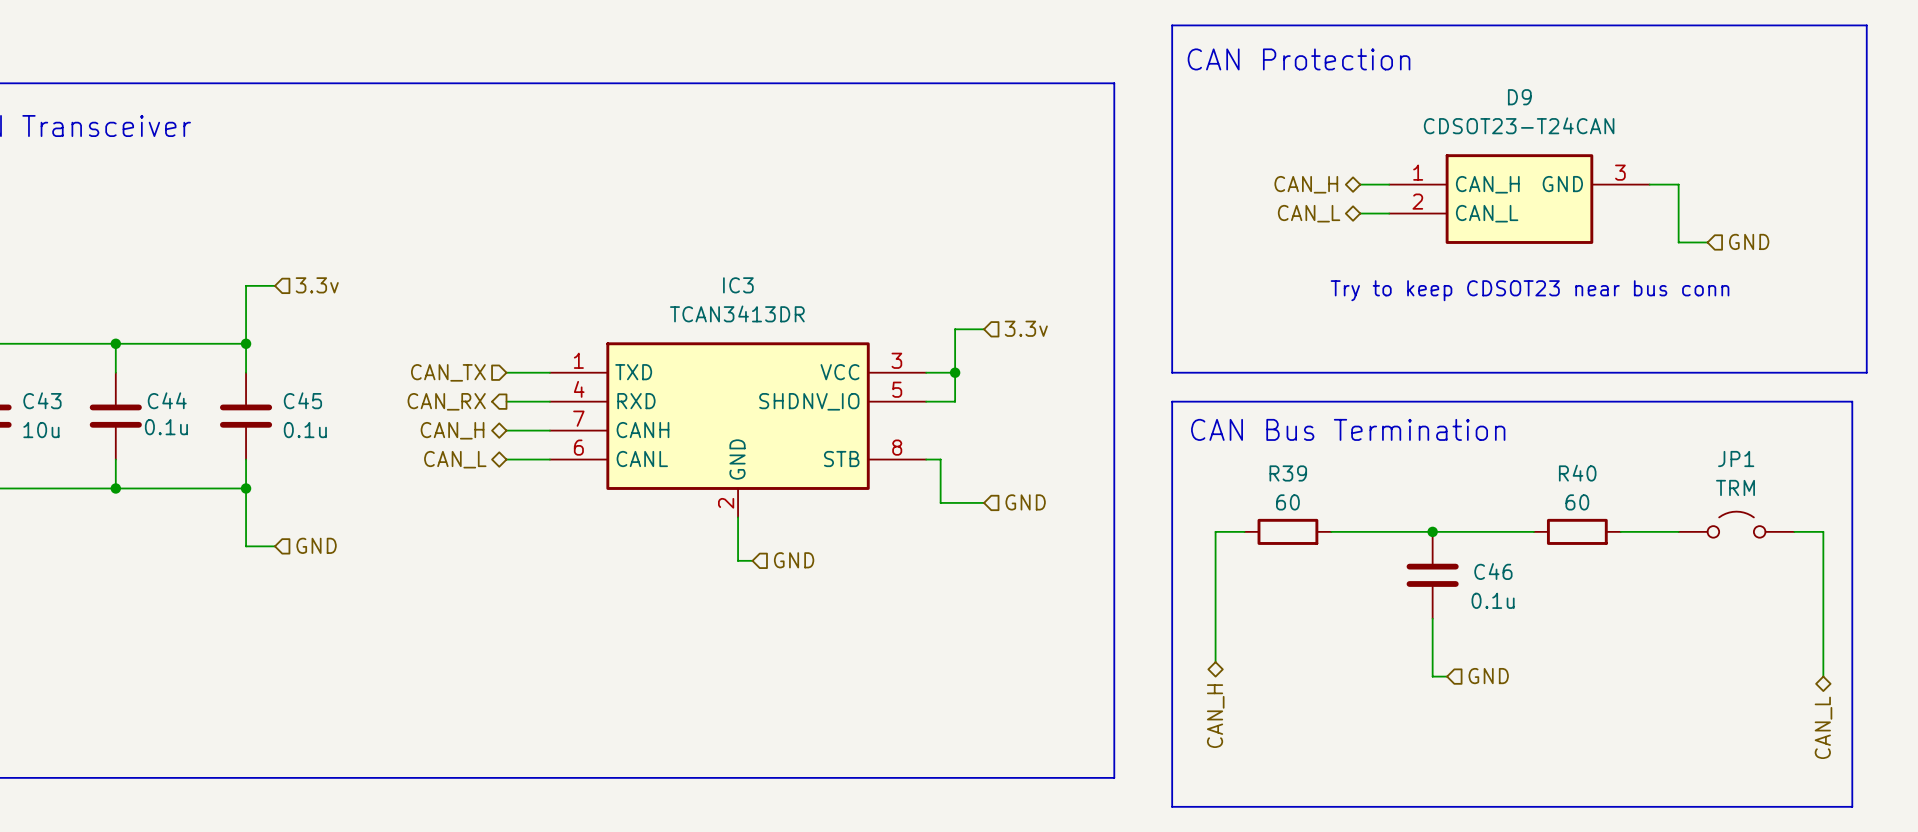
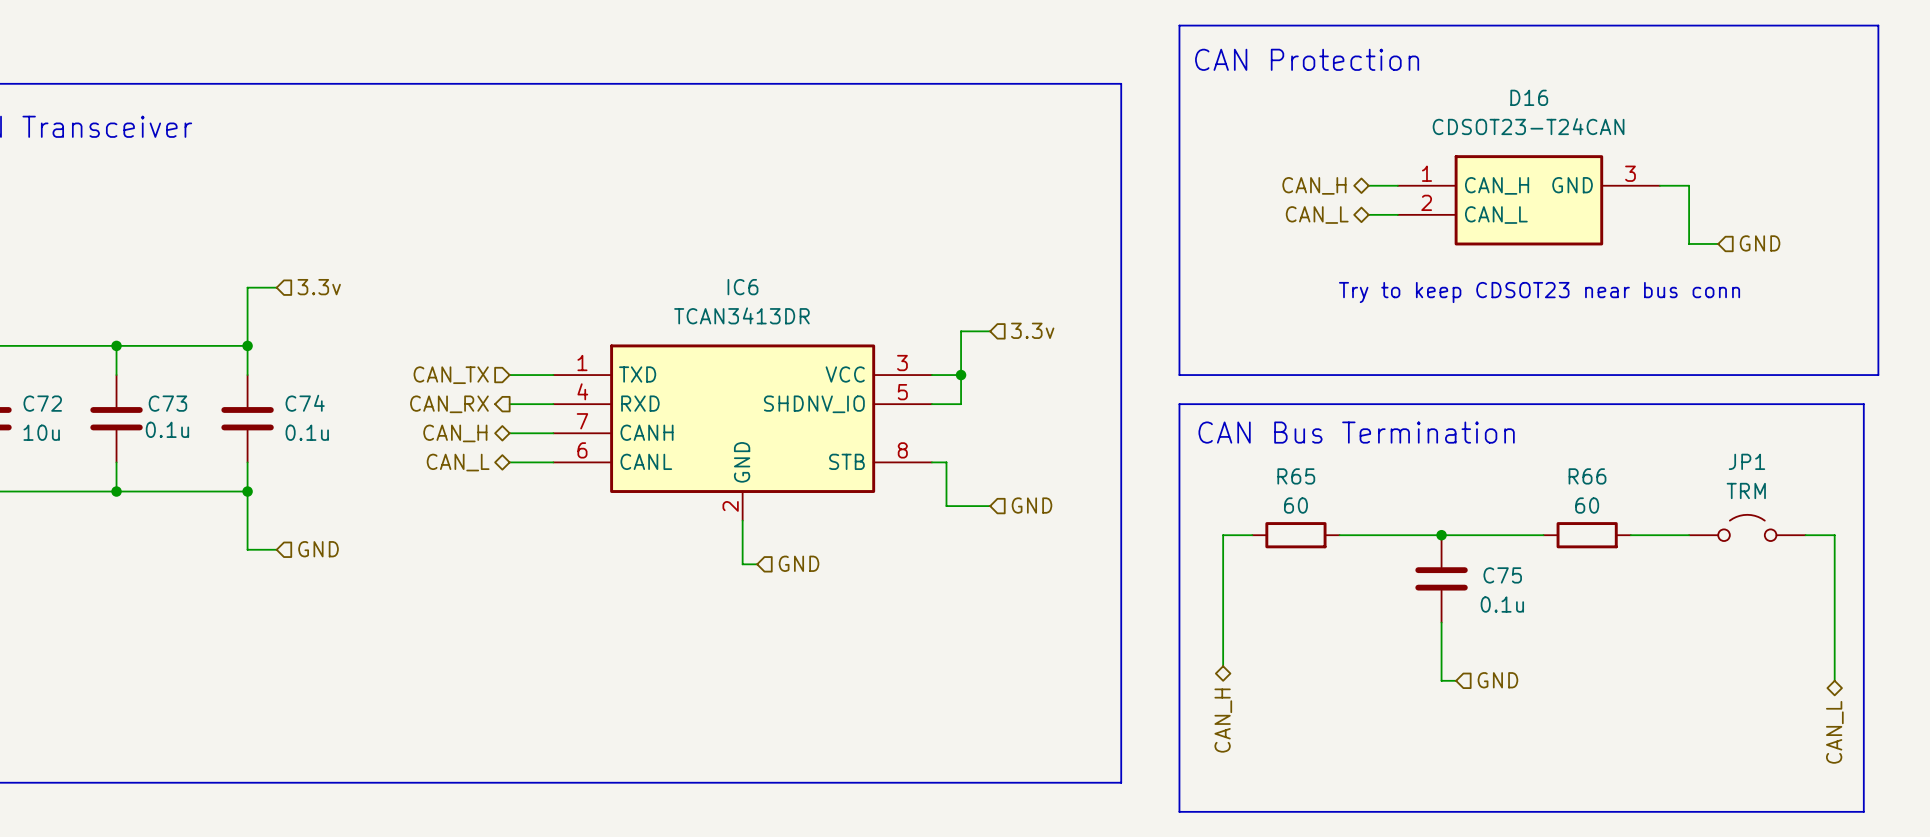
D9 name: D9 (1519, 97) -> D16 (1529, 97)
IC3 name: IC3 (738, 285) -> IC6 (742, 287)
C43 name: C43 (42, 400) -> C72 (42, 403)
C44 name: C44 (167, 400) -> C73 (167, 403)
C45 name: C45 (302, 400) -> C74 (305, 403)
R39 name: R39 (1288, 473) -> R65 (1296, 476)
R40 name: R40 (1577, 473) -> R66 (1587, 476)
C46 name: C46 (1493, 571) -> C75 (1502, 575)

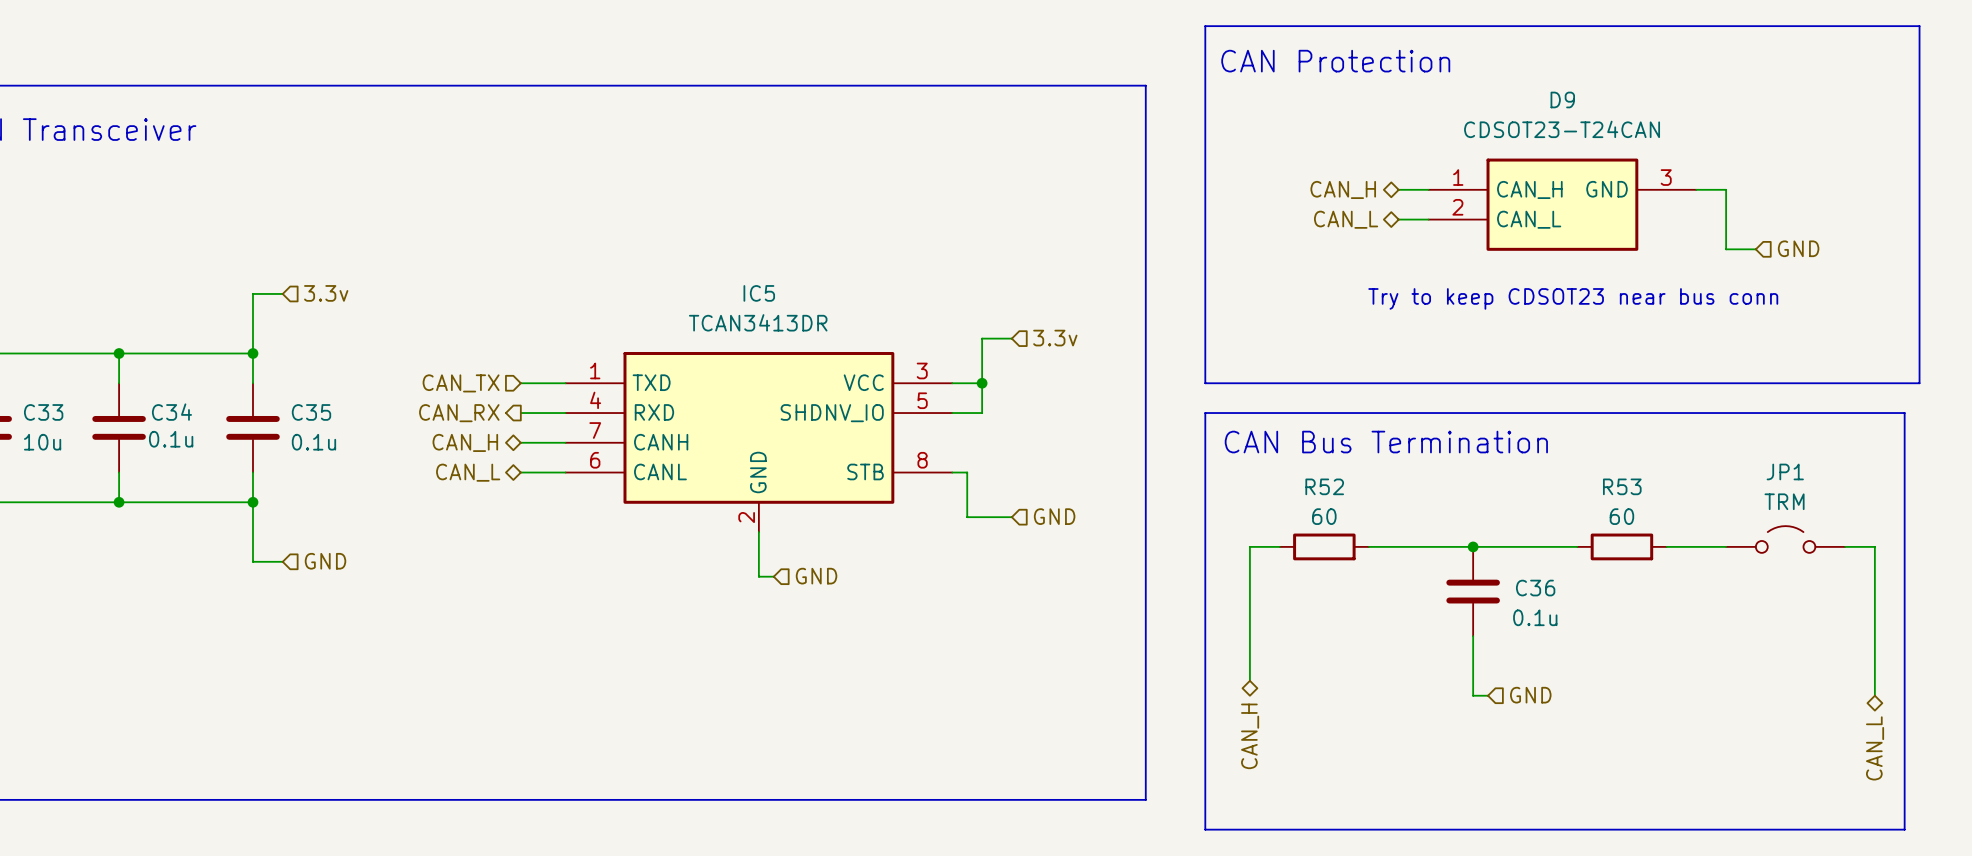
D16 name: D16 (1529, 97) -> D9 (1562, 99)
IC6 name: IC6 (742, 287) -> IC5 (759, 293)
C72 name: C72 (42, 403) -> C33 (43, 412)
C73 name: C73 (167, 403) -> C34 (171, 412)
C74 name: C74 (305, 403) -> C35 (311, 412)
R65 name: R65 (1296, 476) -> R52 (1324, 486)
R66 name: R66 (1587, 476) -> R53 (1622, 486)
C75 name: C75 (1502, 575) -> C36 (1535, 588)

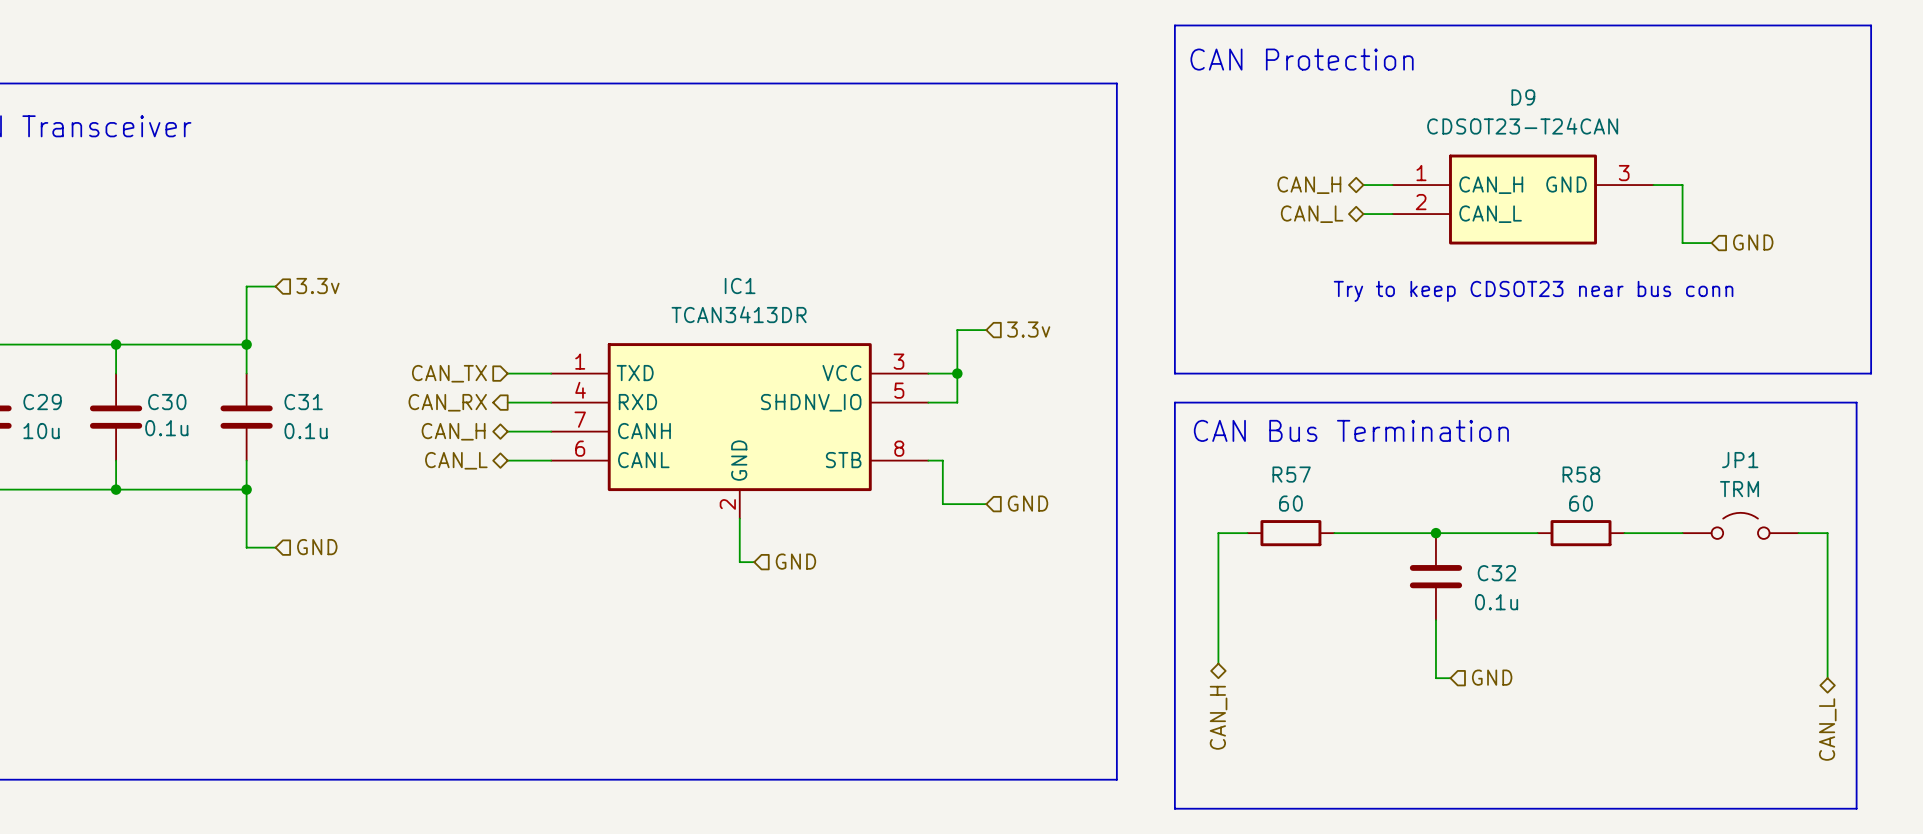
IC5 name: IC5 (759, 293) -> IC1 (740, 286)
C33 name: C33 (43, 412) -> C29 (42, 402)
C34 name: C34 (171, 412) -> C30 (167, 402)
C35 name: C35 (311, 412) -> C31 (303, 402)
R52 name: R52 (1324, 486) -> R57 (1291, 474)
R53 name: R53 (1622, 486) -> R58 (1581, 474)
C36 name: C36 (1535, 588) -> C32 (1496, 573)

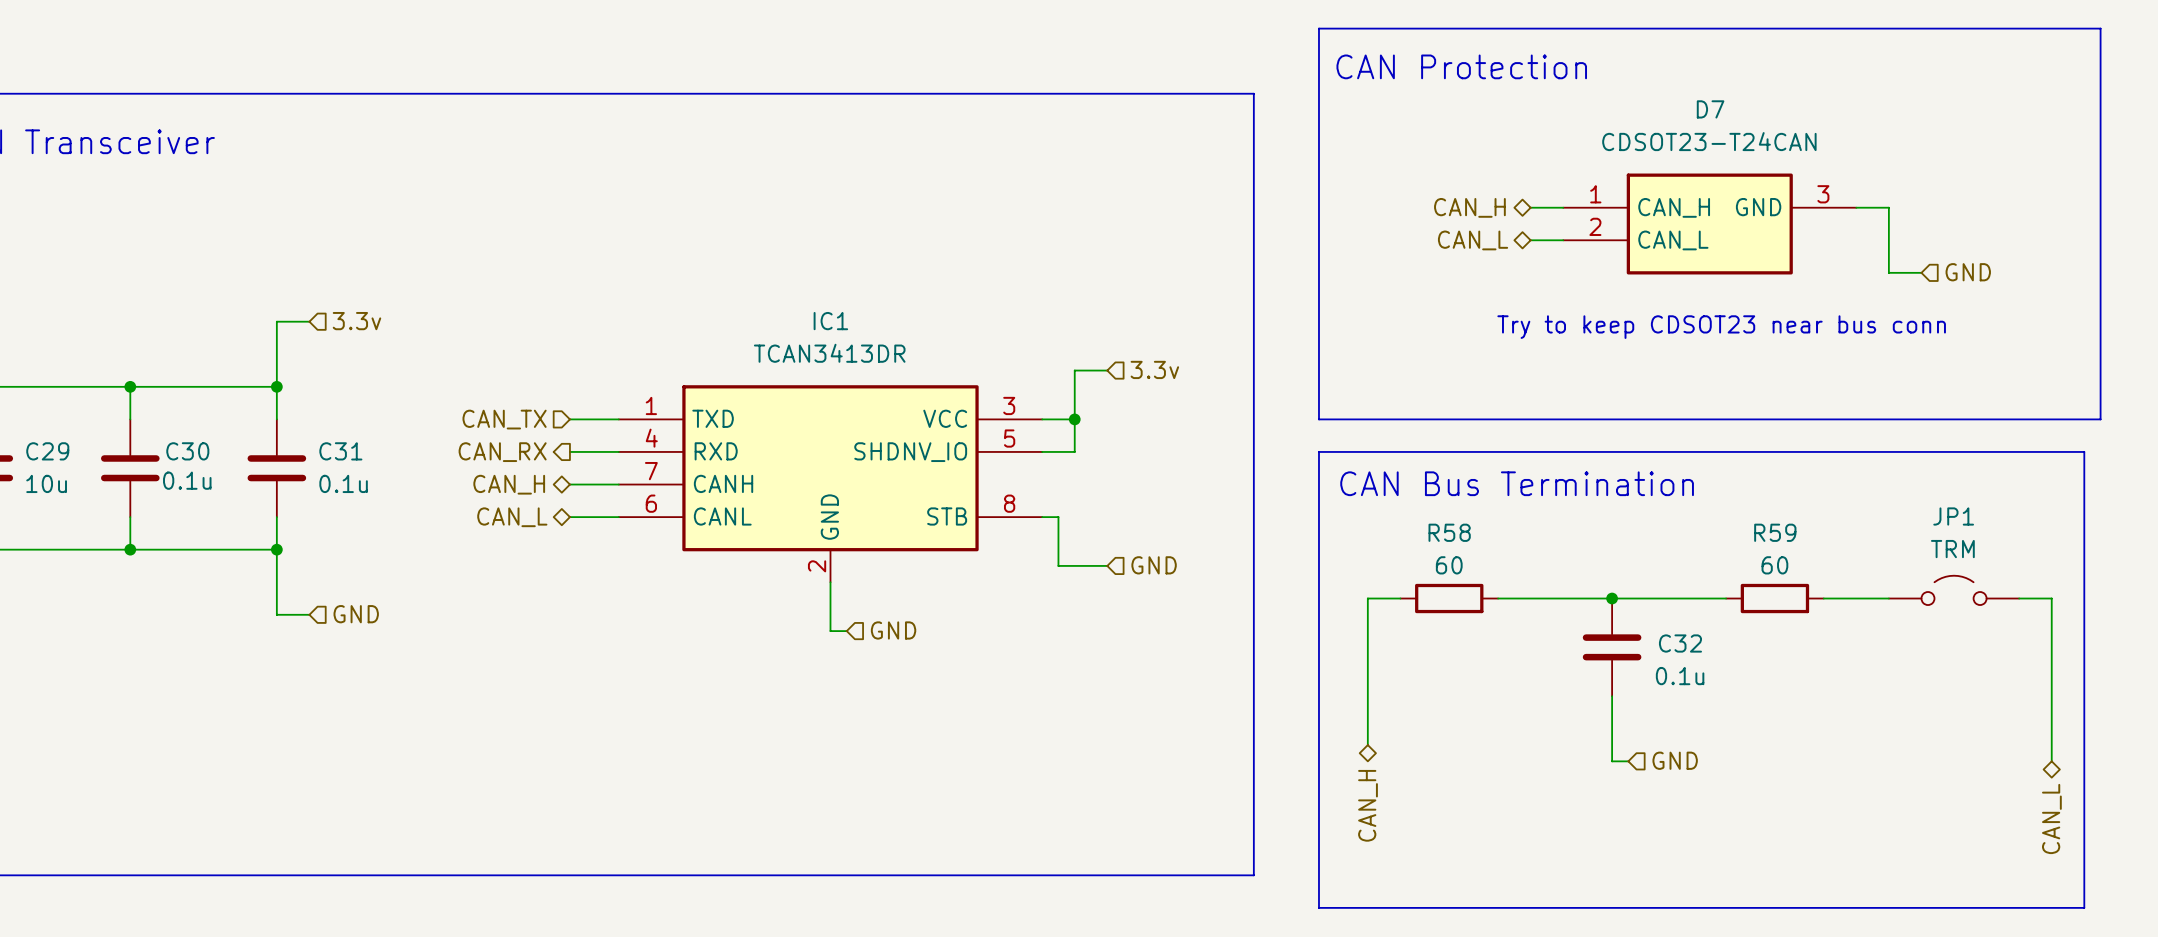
D9 name: D9 (1523, 97) -> D7 (1710, 109)
R57 name: R57 (1291, 474) -> R58 (1449, 532)
R58 name: R58 (1581, 474) -> R59 (1775, 532)

